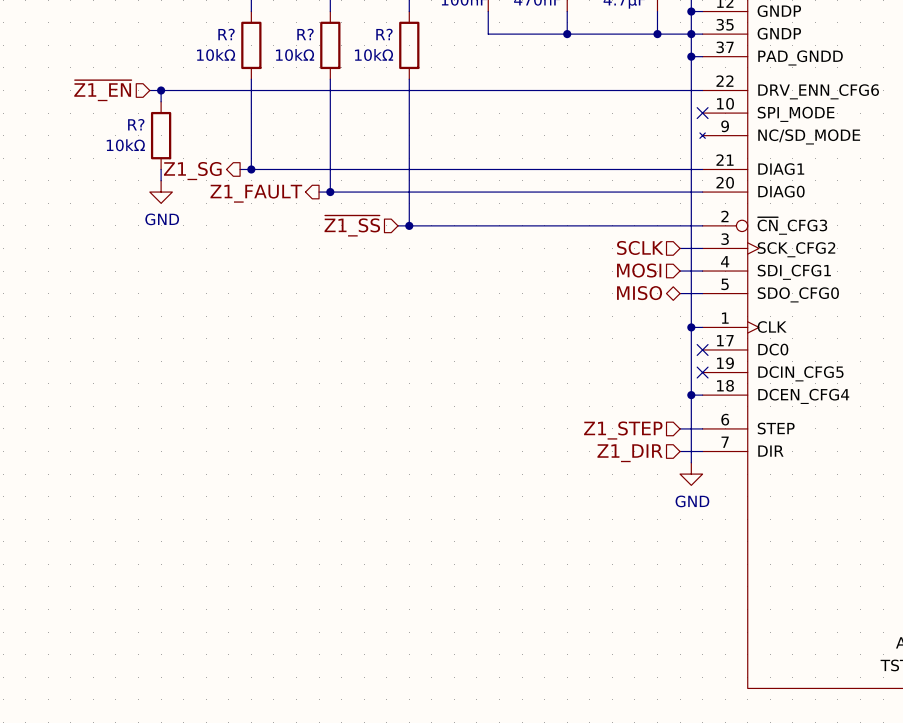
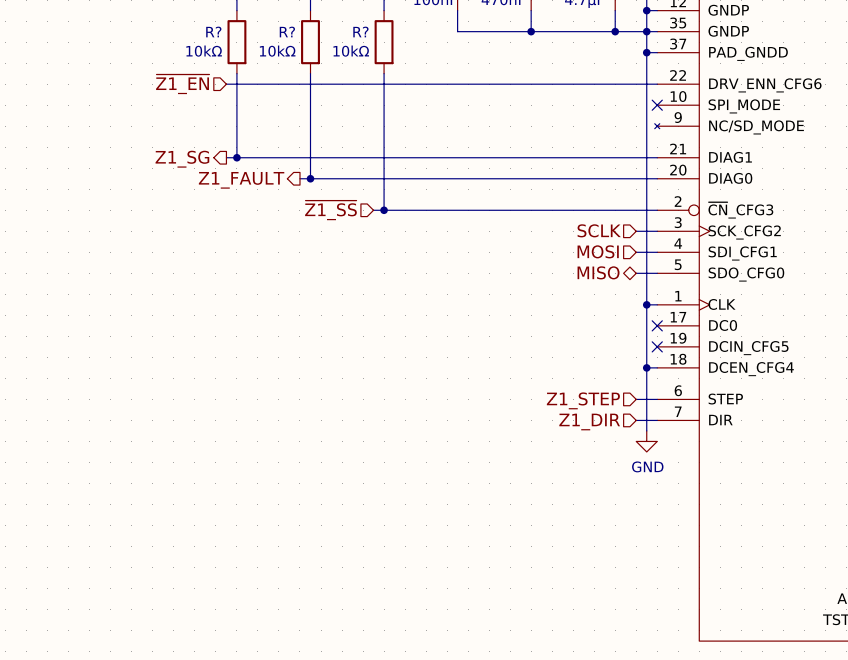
hierarchical label position: ~{Z1_EN} (102, 90) -> ~{Z1_EN} (182, 84)
wire: (149, 90) (240, 90) -> none
wire: (161, 90) (161, 101) -> none
junction: (161, 90) -> none
R?: 10kΩ (161, 135) -> none
wire: (161, 169) (161, 180) -> none
power symbol: GND (161, 192) -> none

